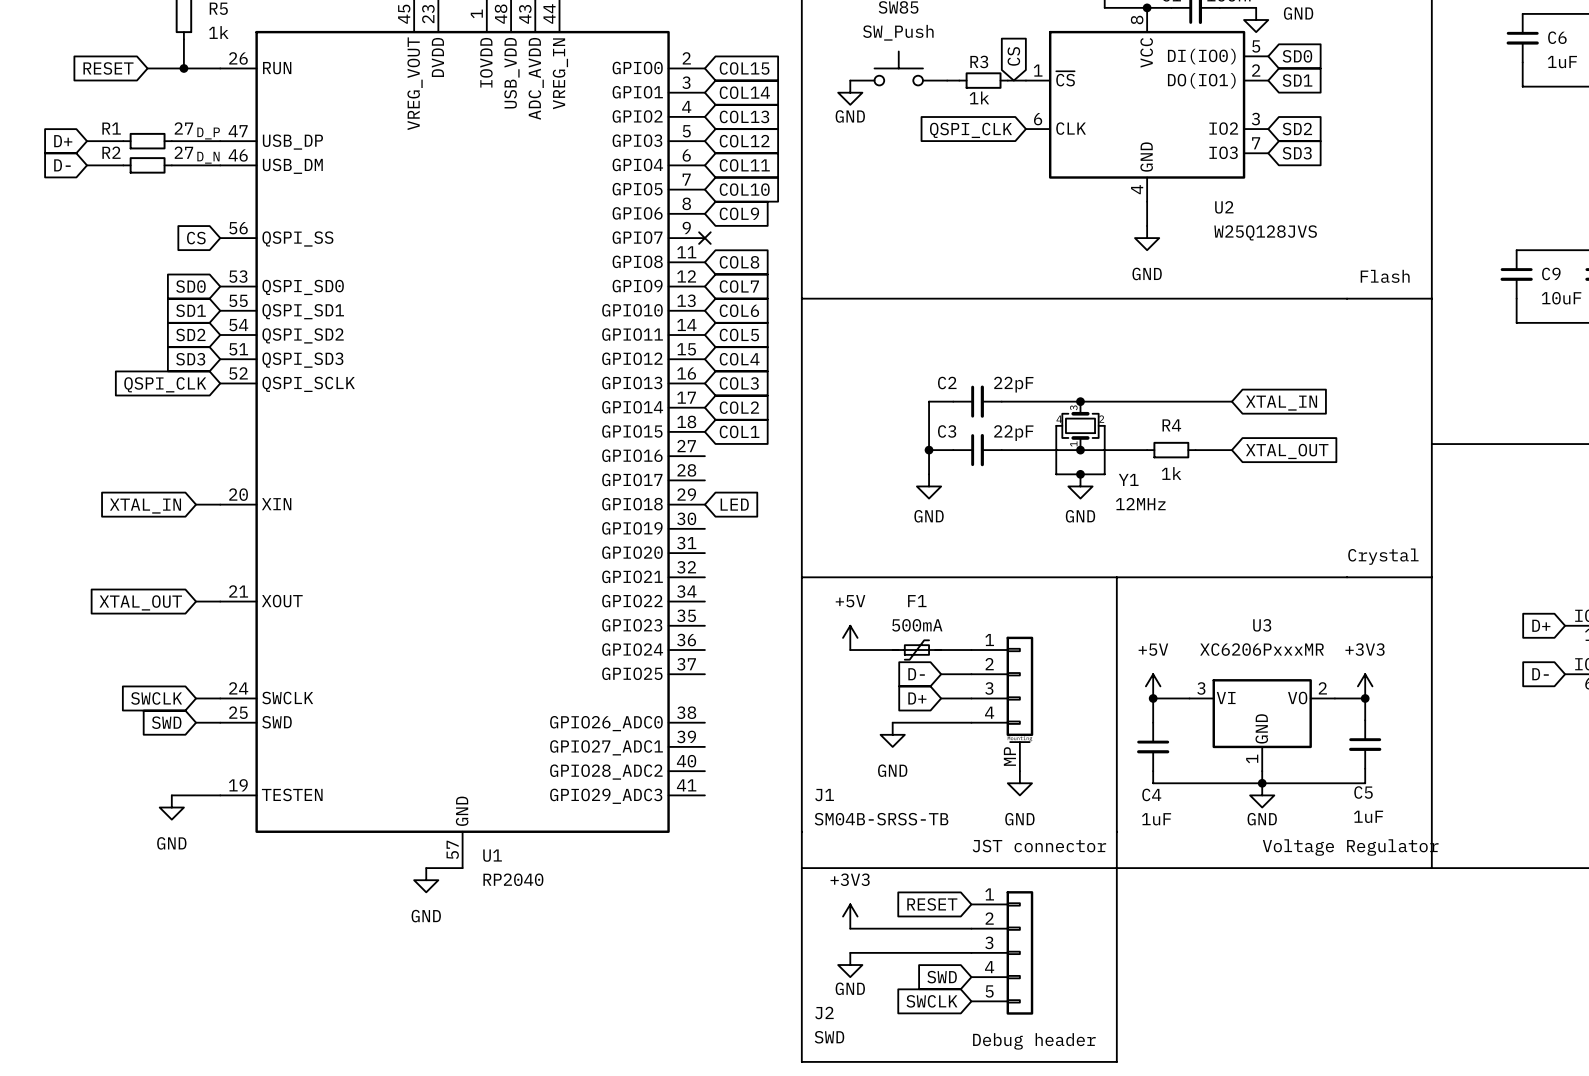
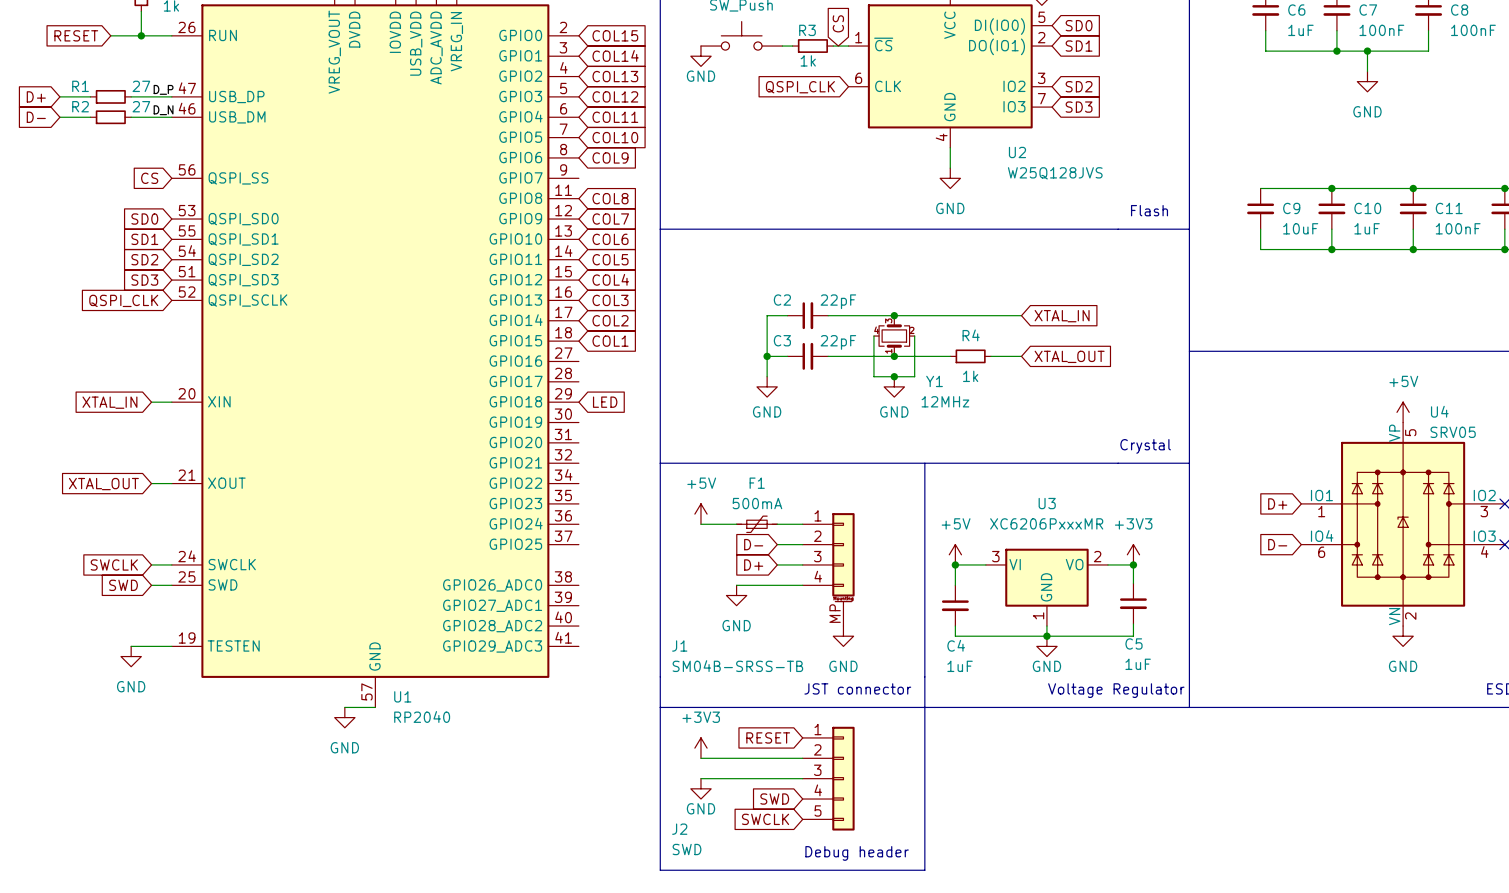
no-connect mark: (704, 238) -> none

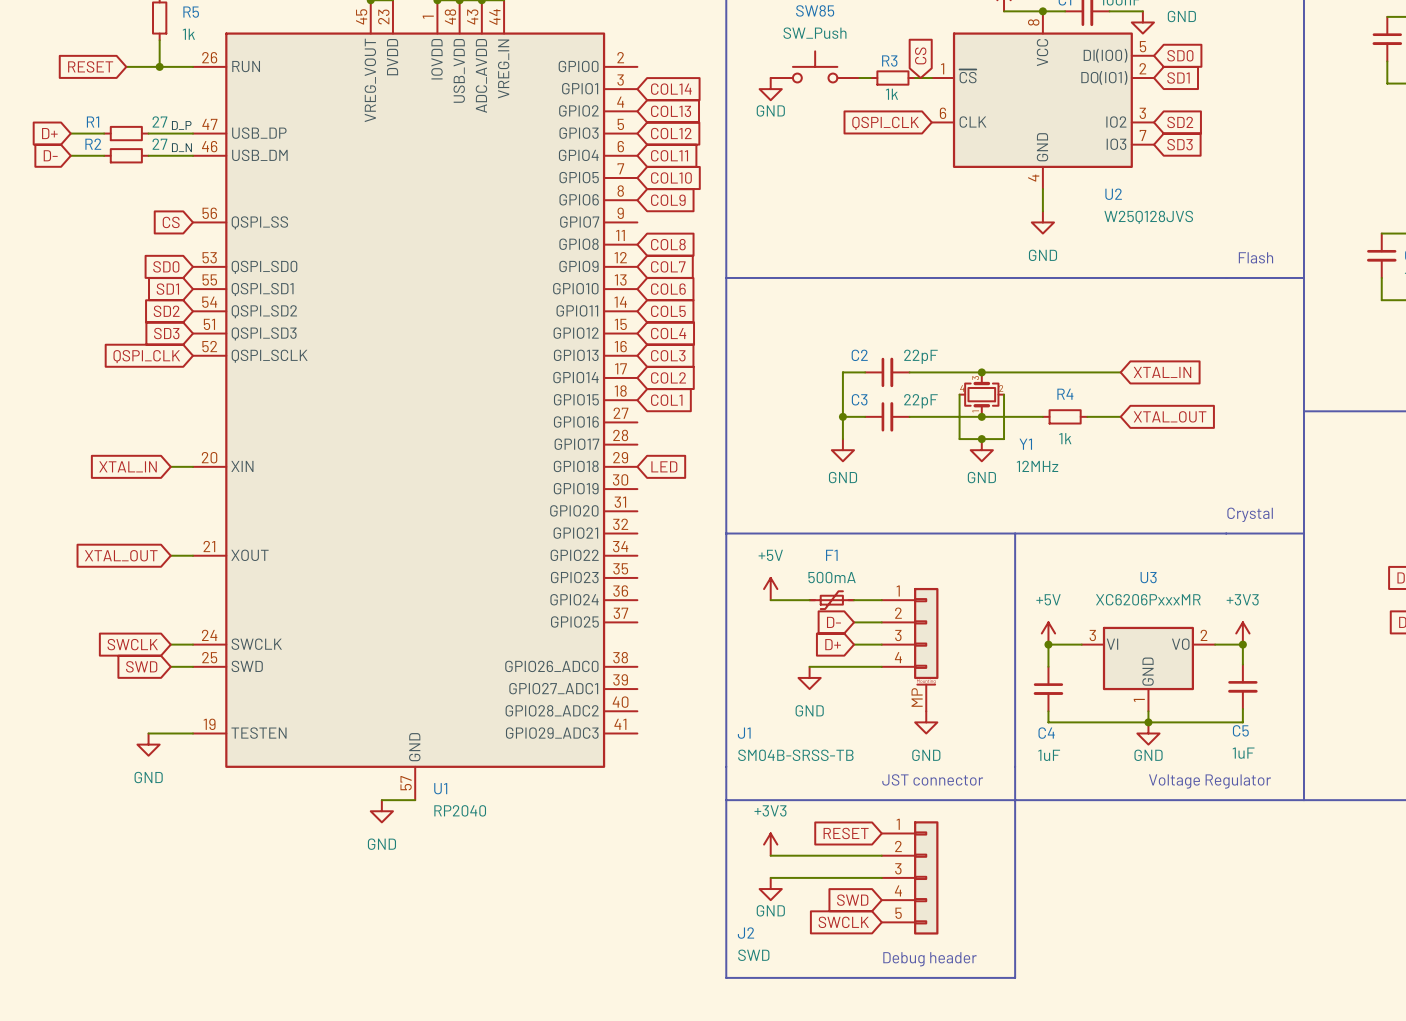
global label: COL15 (615, 35) -> none

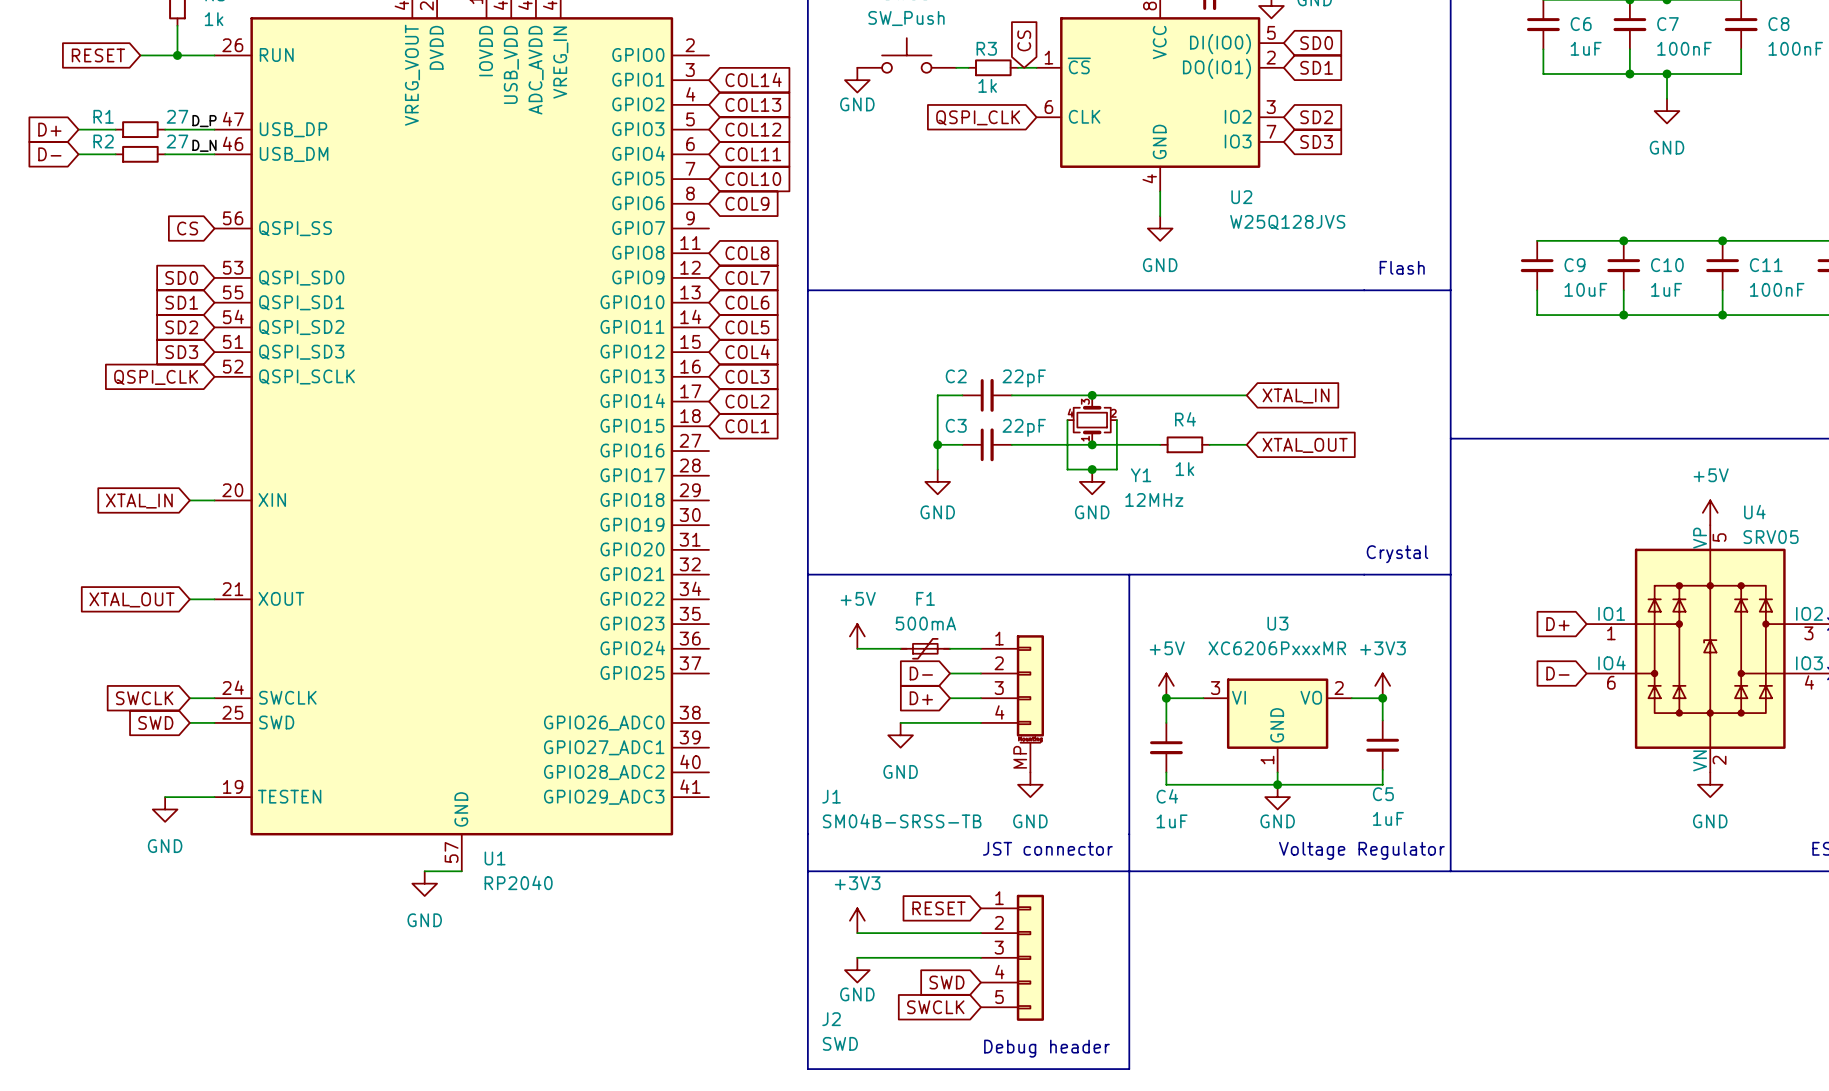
global label: LED (664, 466) -> none

